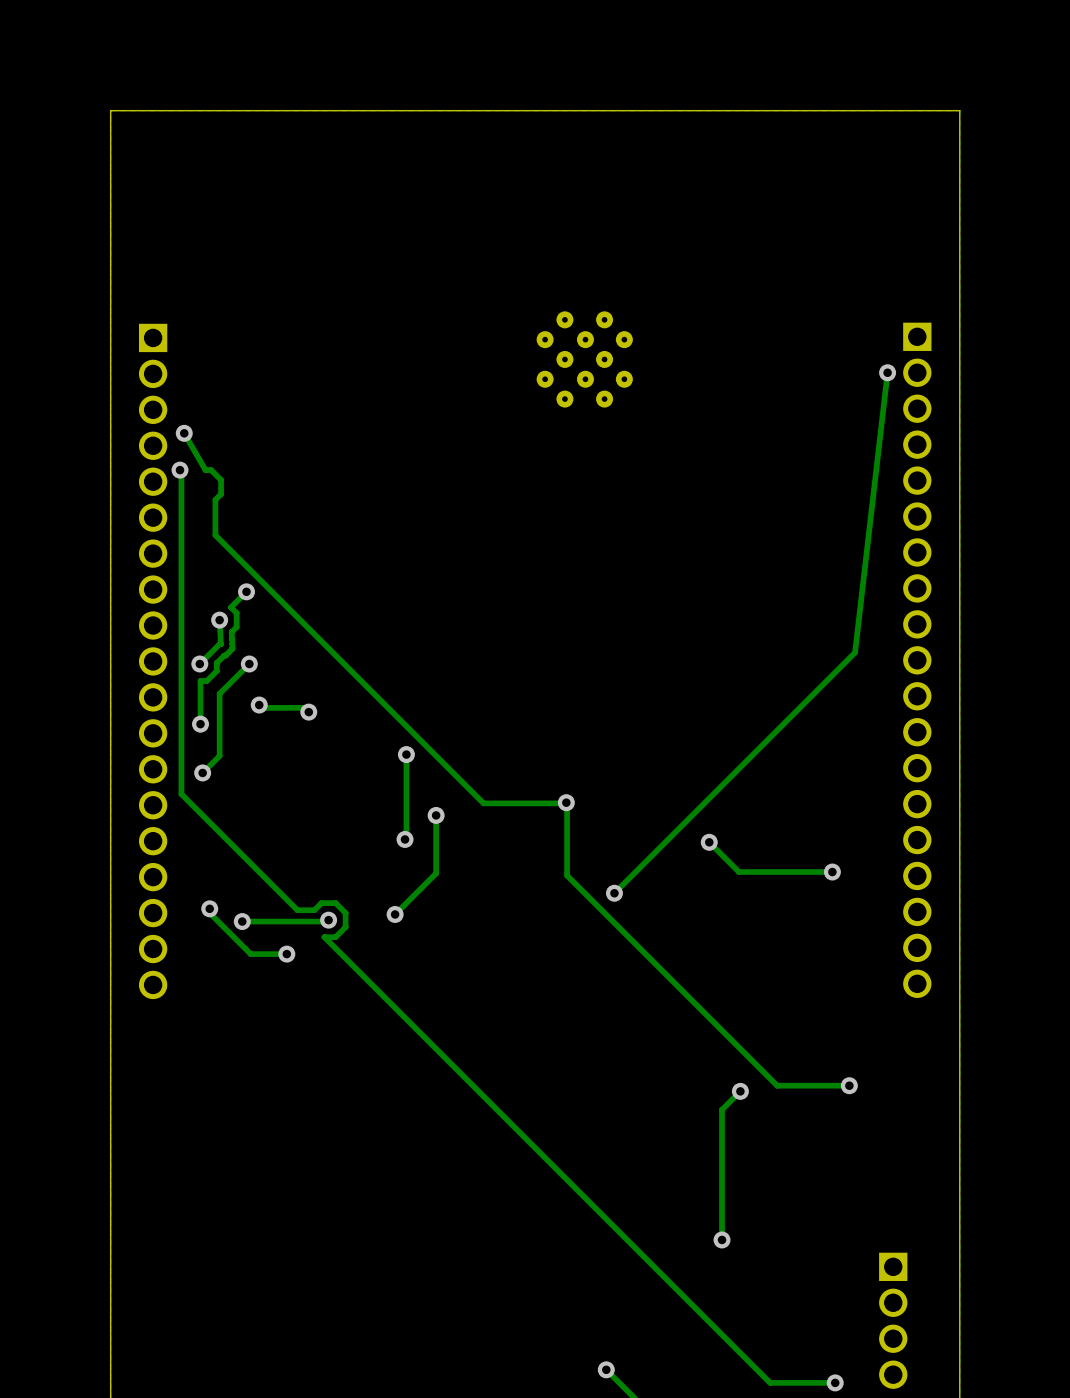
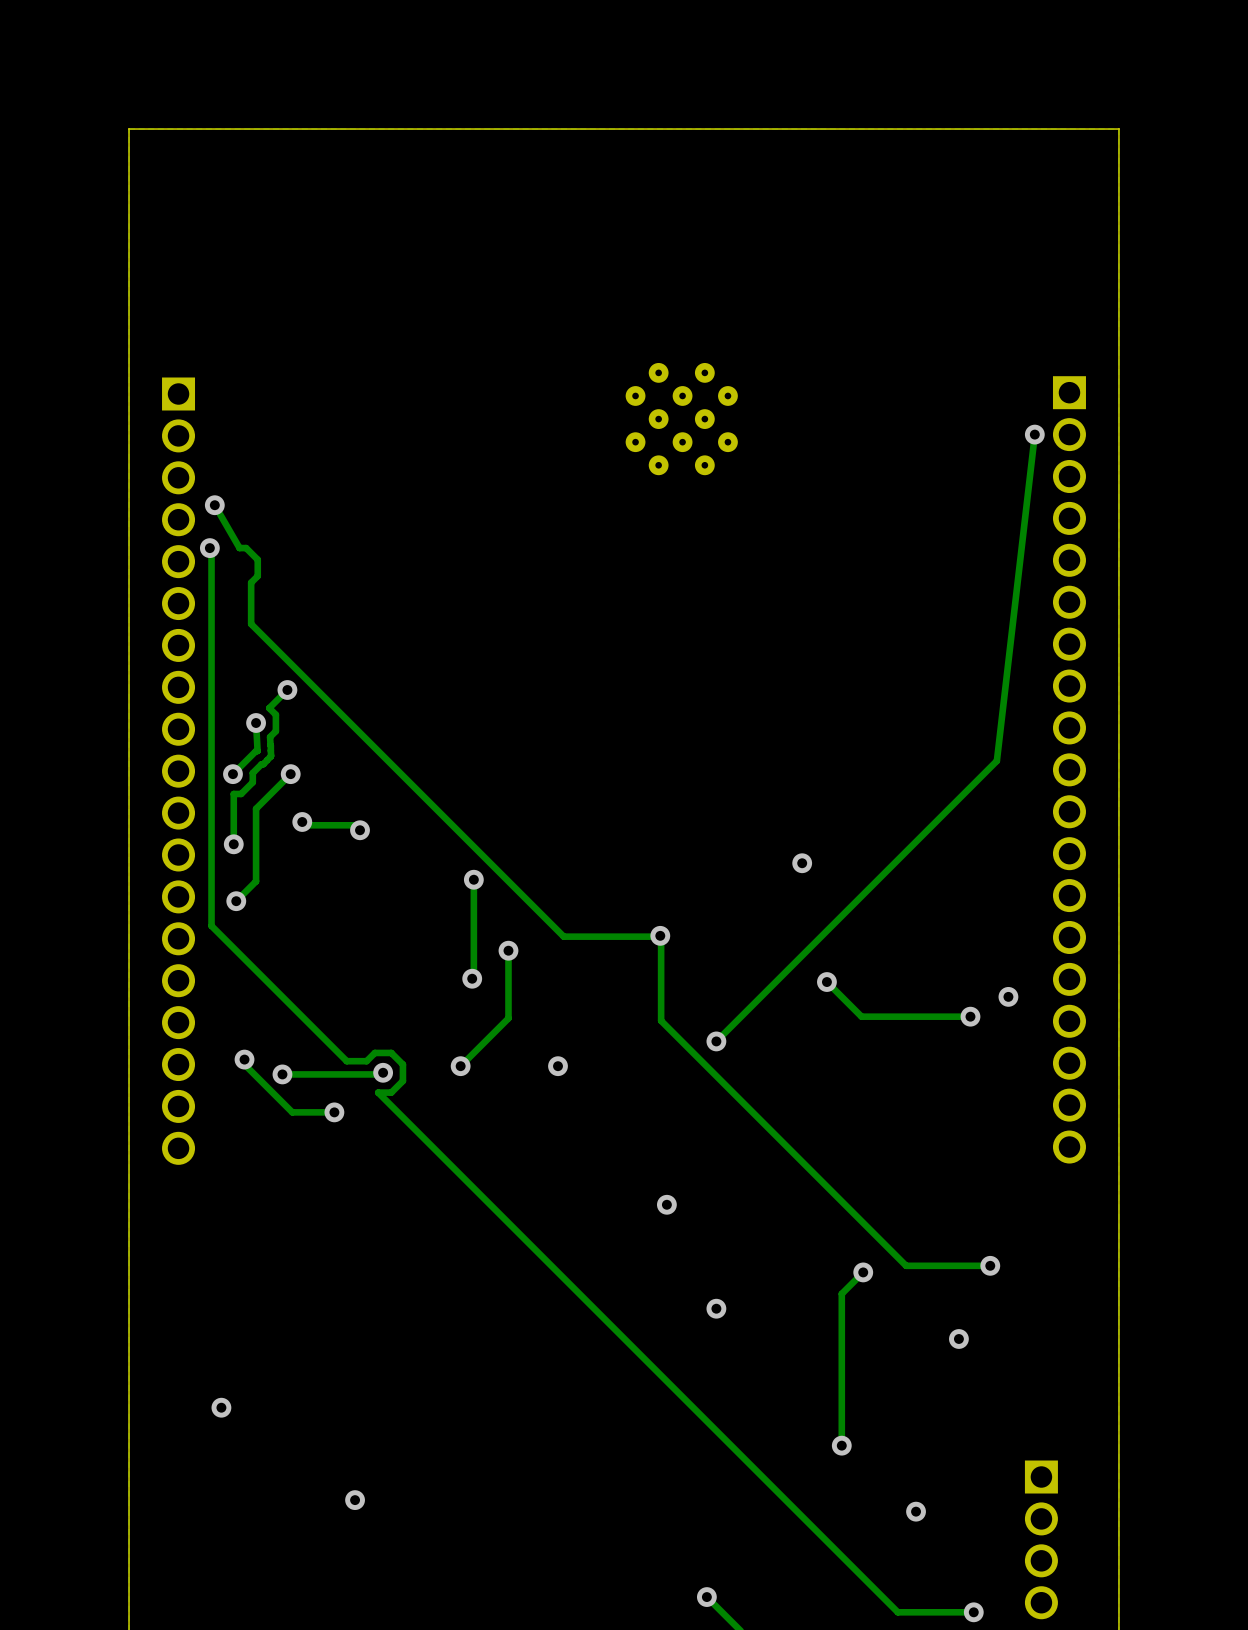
via: none -> (802, 863)
via: none -> (1008, 996)
via: none -> (558, 1066)
via: none -> (666, 1204)
via: none -> (716, 1308)
via: none -> (958, 1339)
via: none -> (221, 1407)
via: none -> (355, 1500)
via: none -> (916, 1511)

